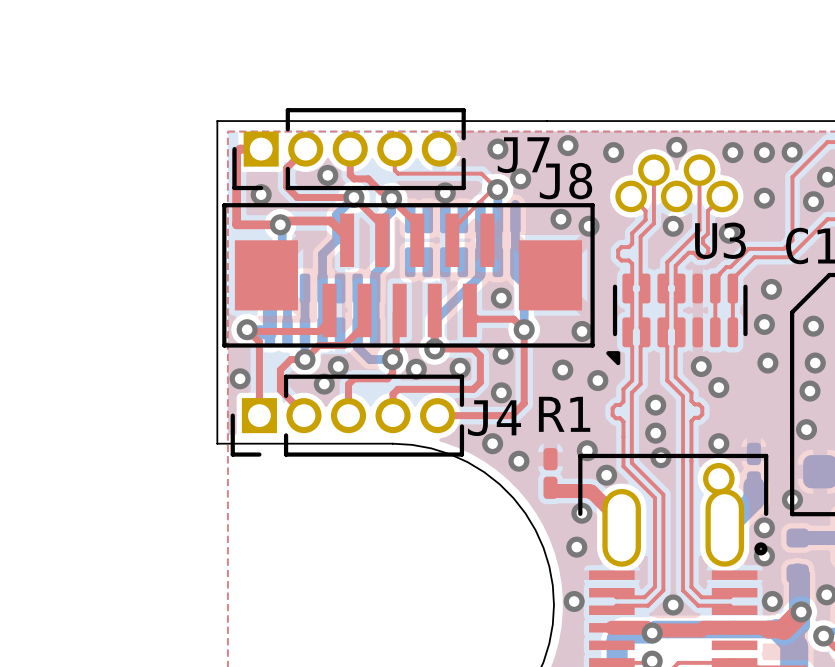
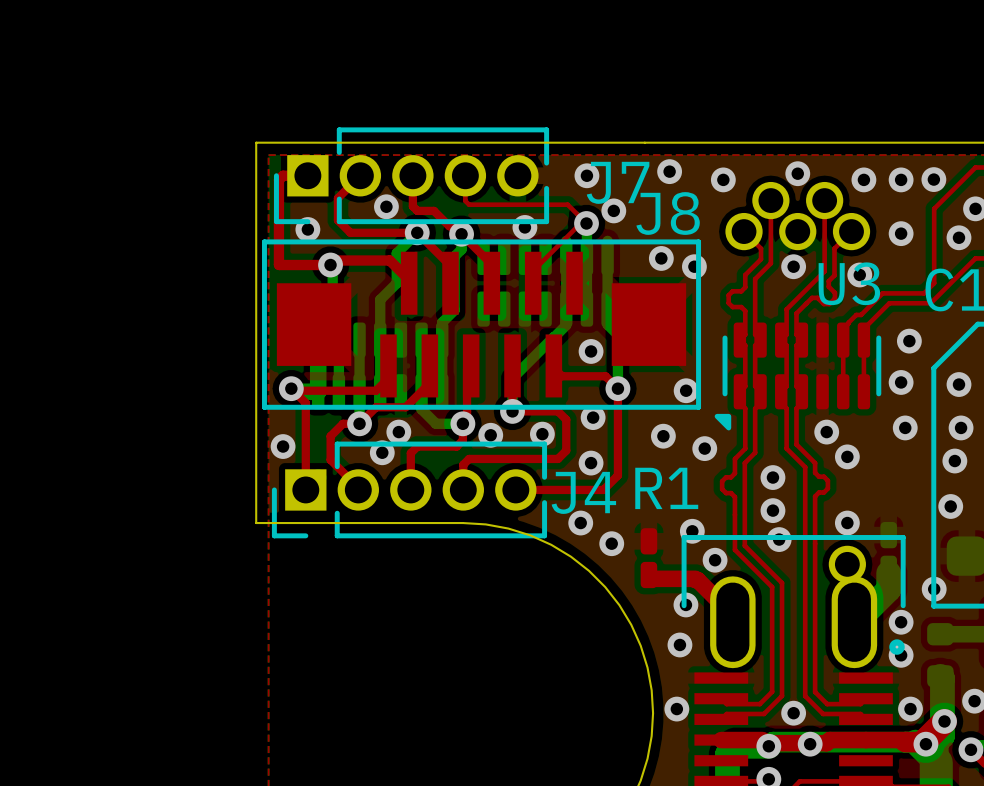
via: none -> (810, 744)
via: none -> (925, 744)

